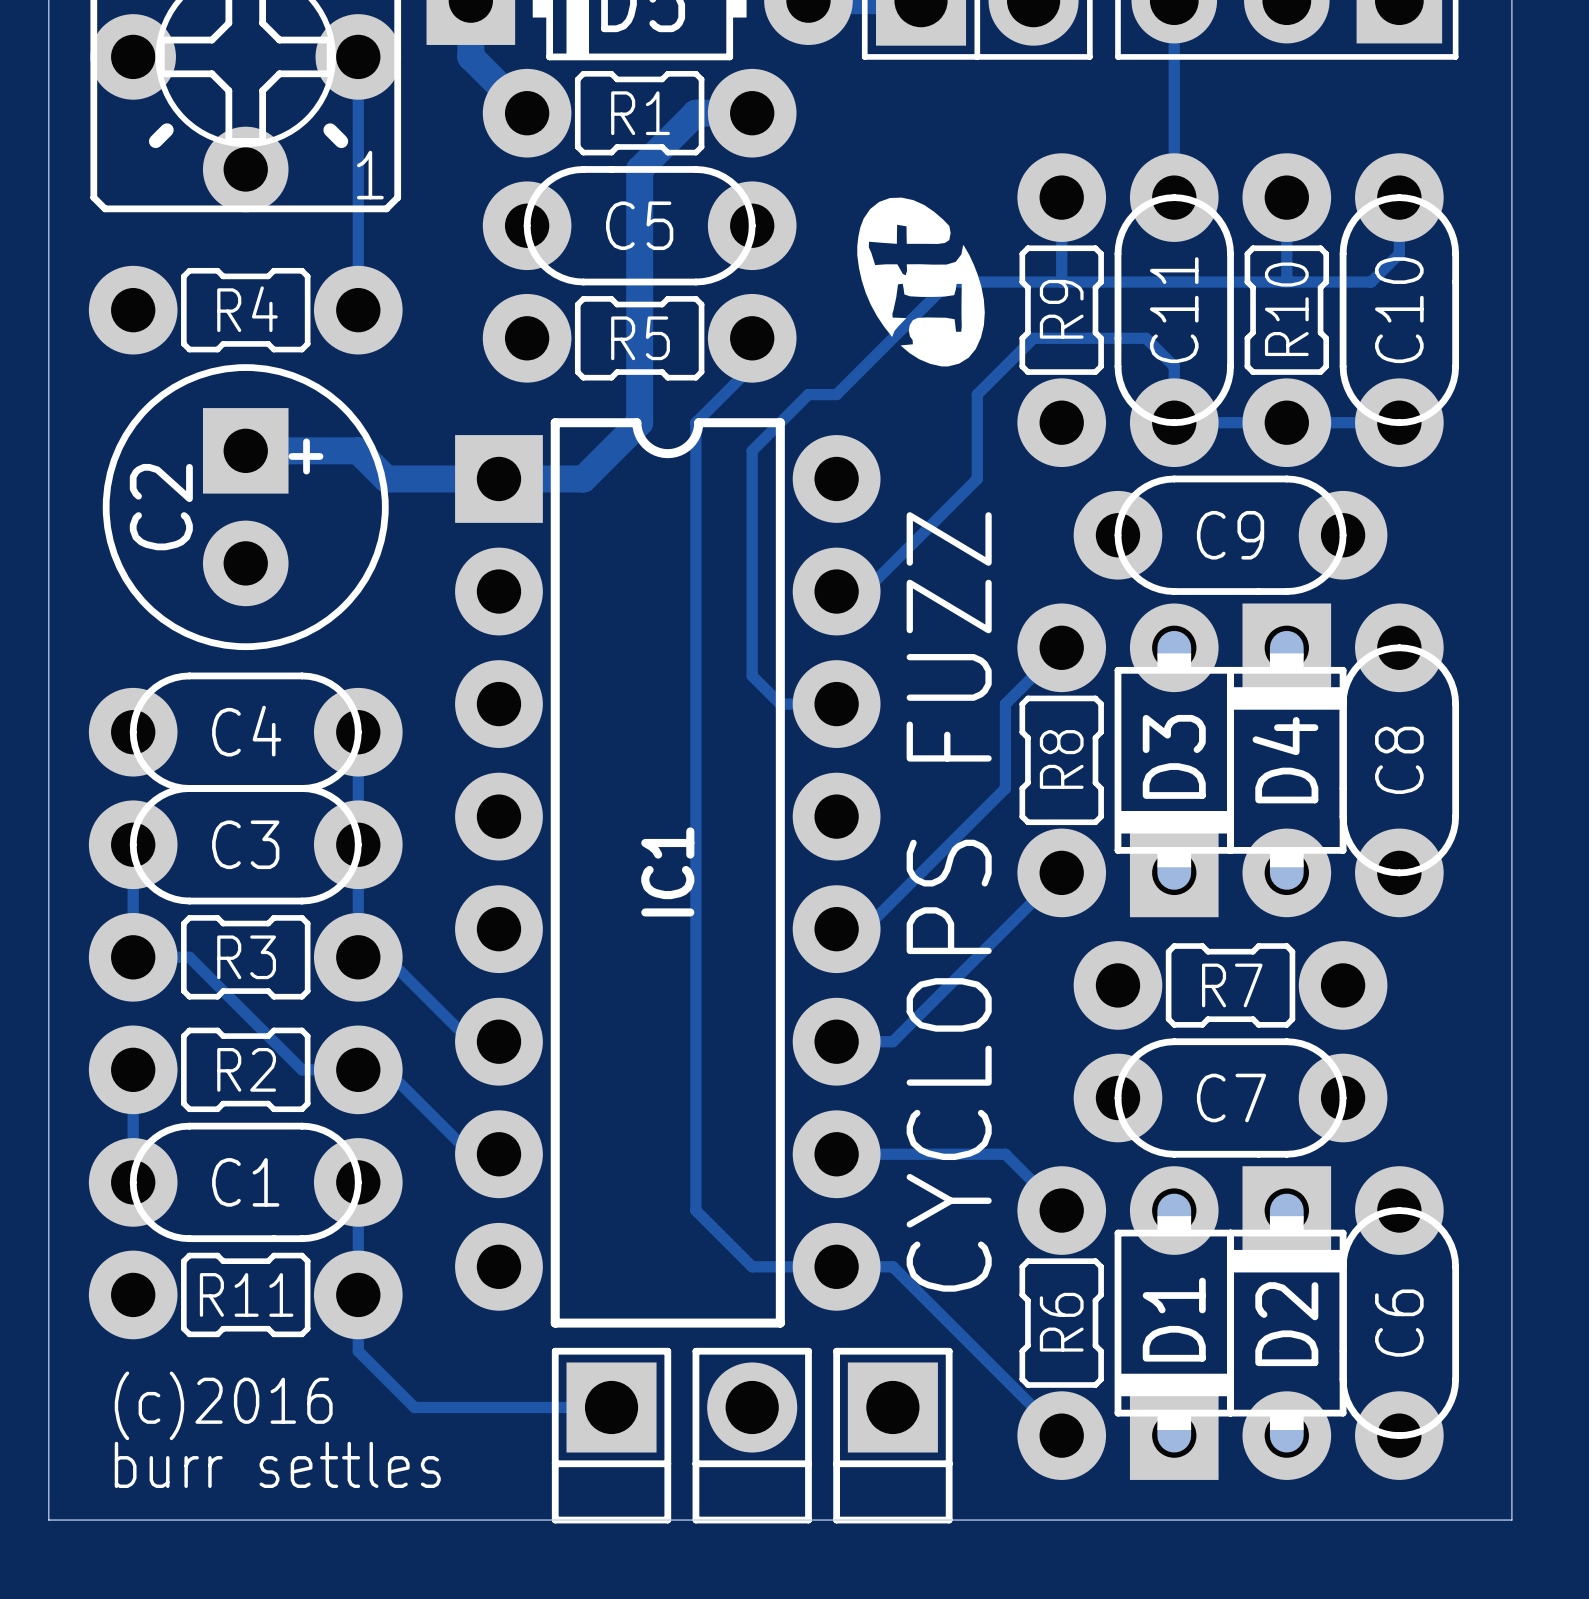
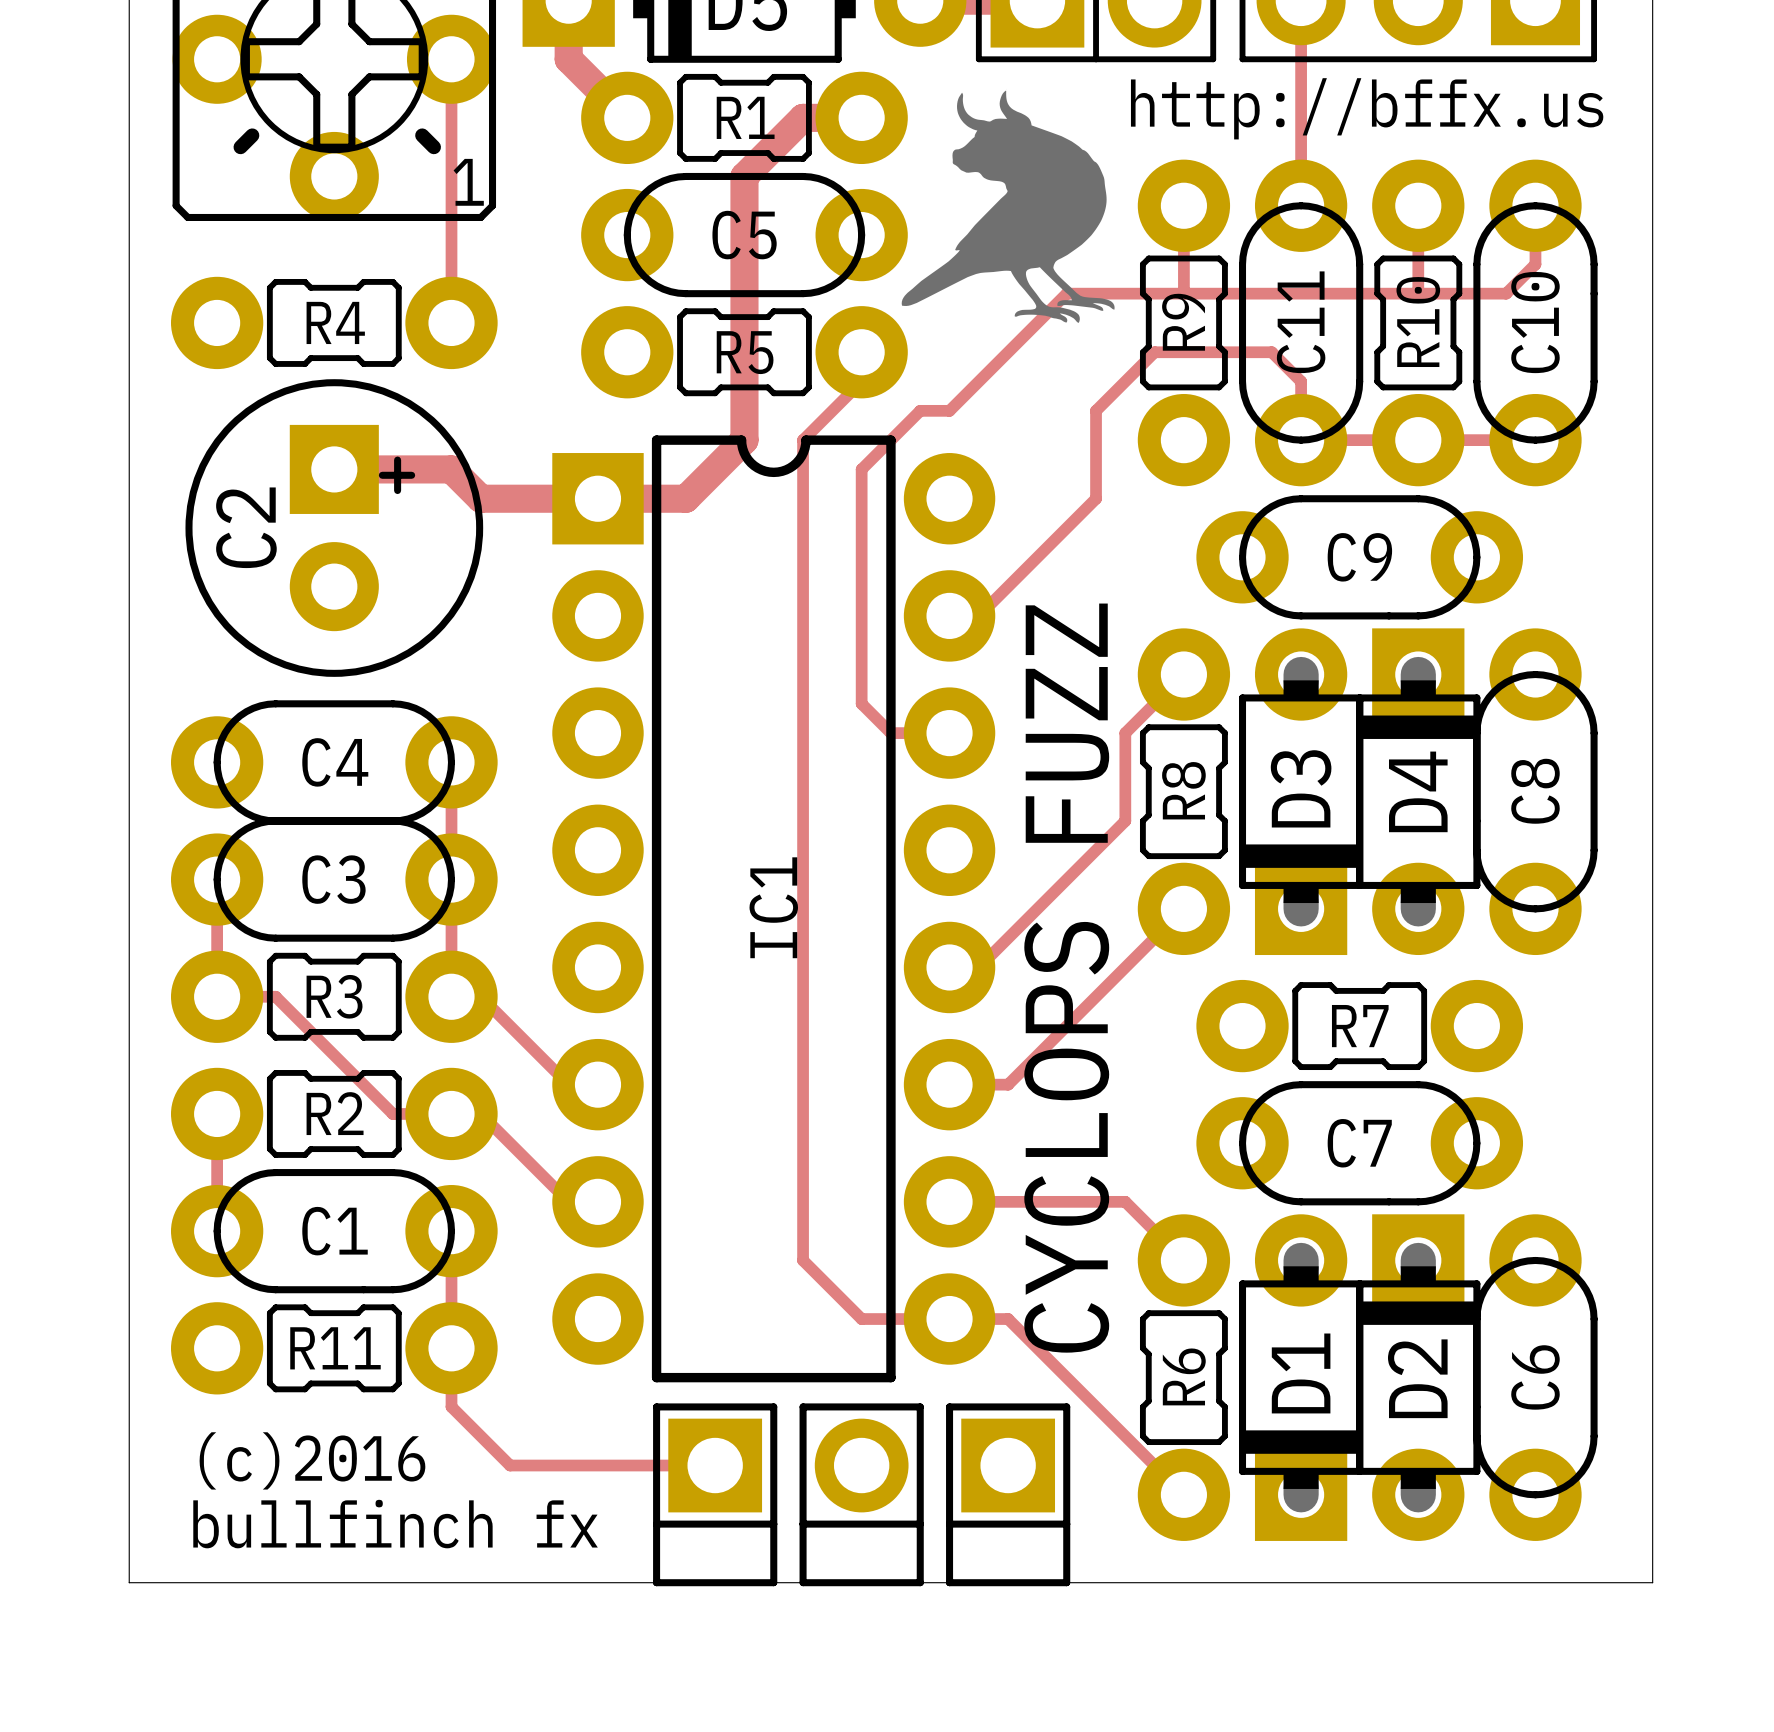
drawing: none -> [901, 88, 1115, 323]
text: none -> http://bffx.us (1367, 108)
drawing: [857, 197, 985, 367] -> none
text: burr settles (277, 1464) -> bullfinch fx (395, 1524)

